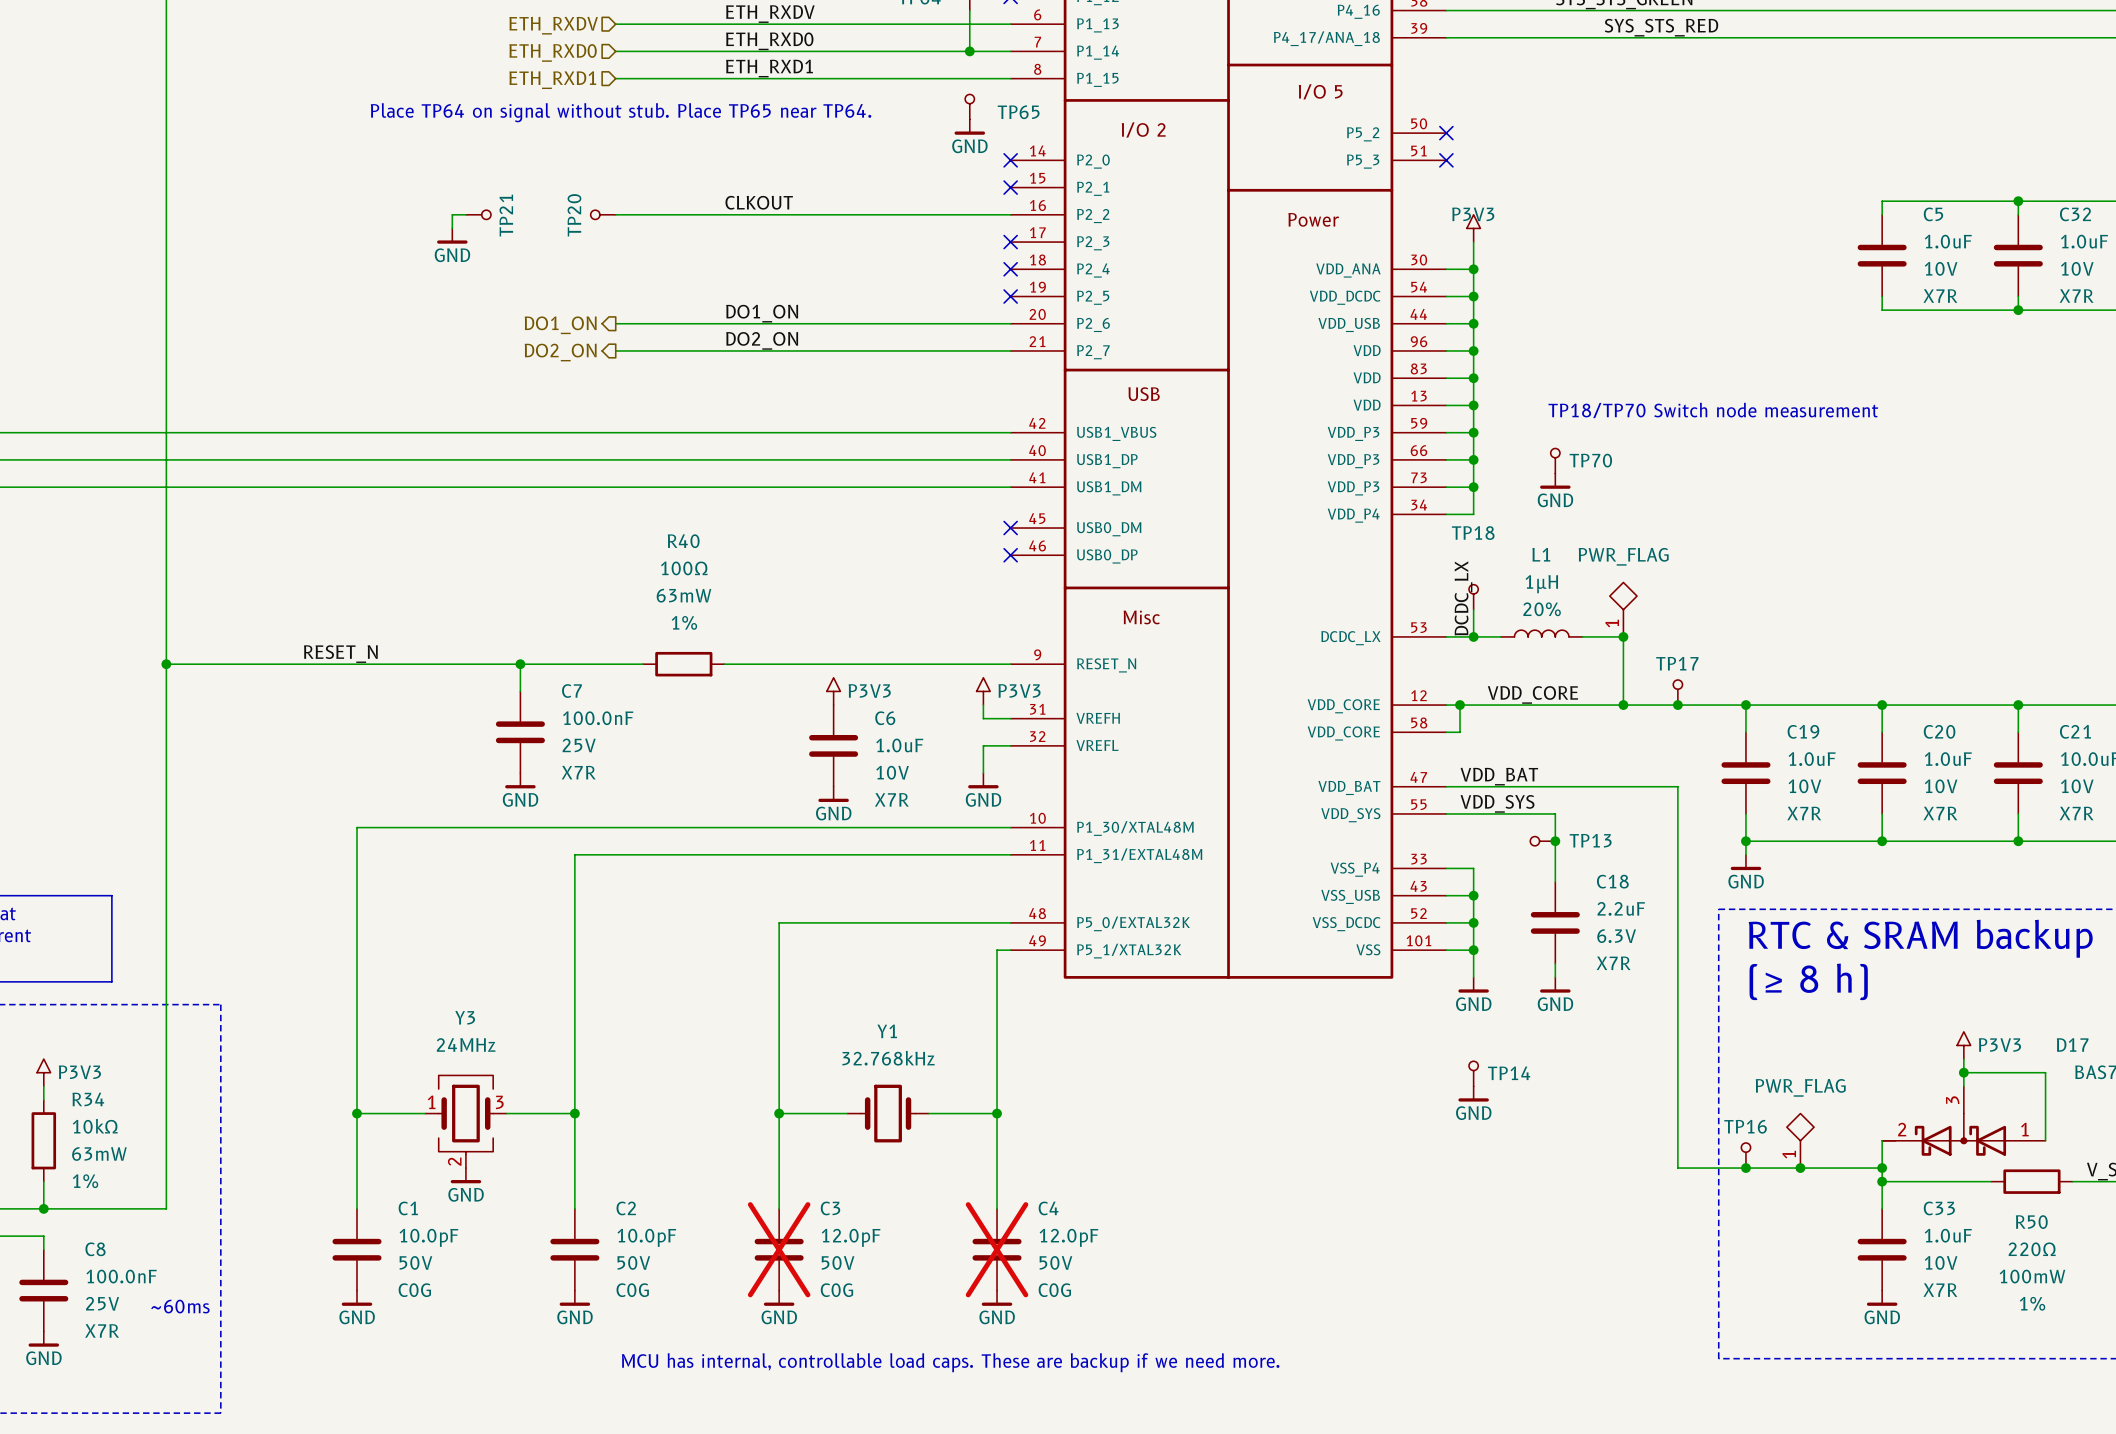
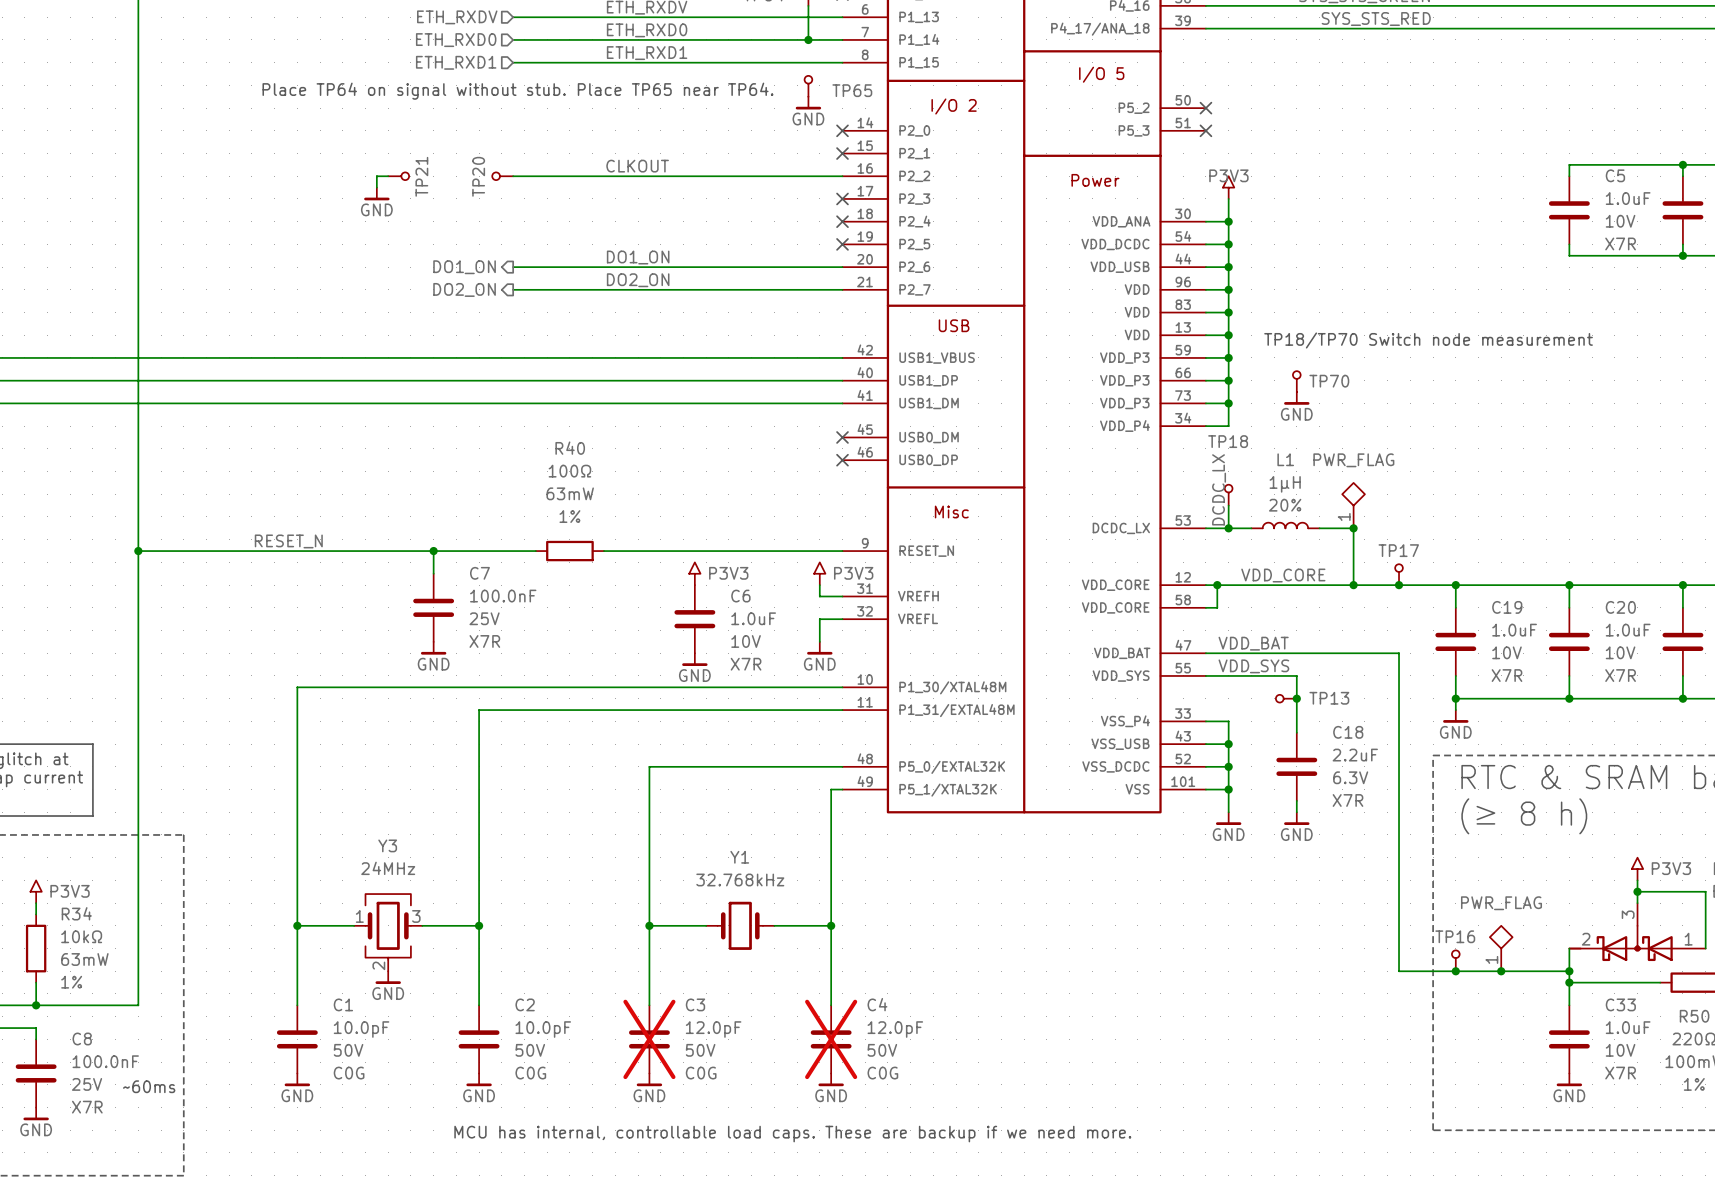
TP14: (1473, 1073) -> none
power symbol: GND (1473, 1093) -> none

